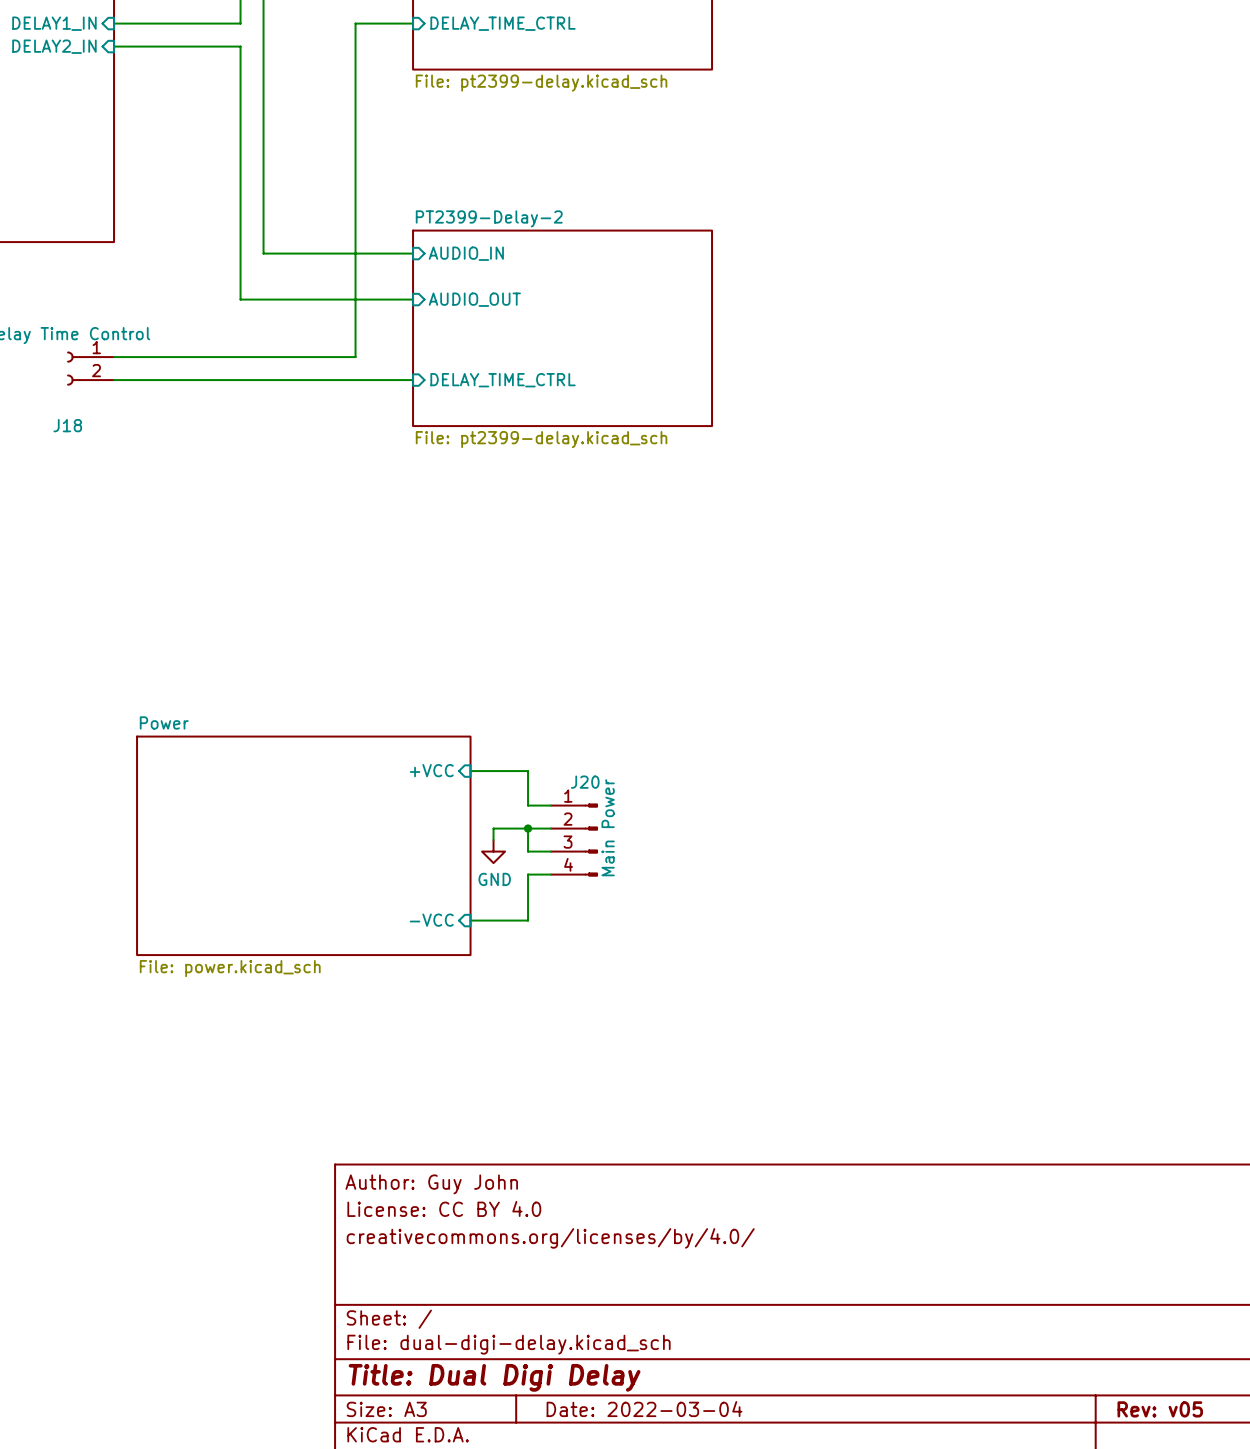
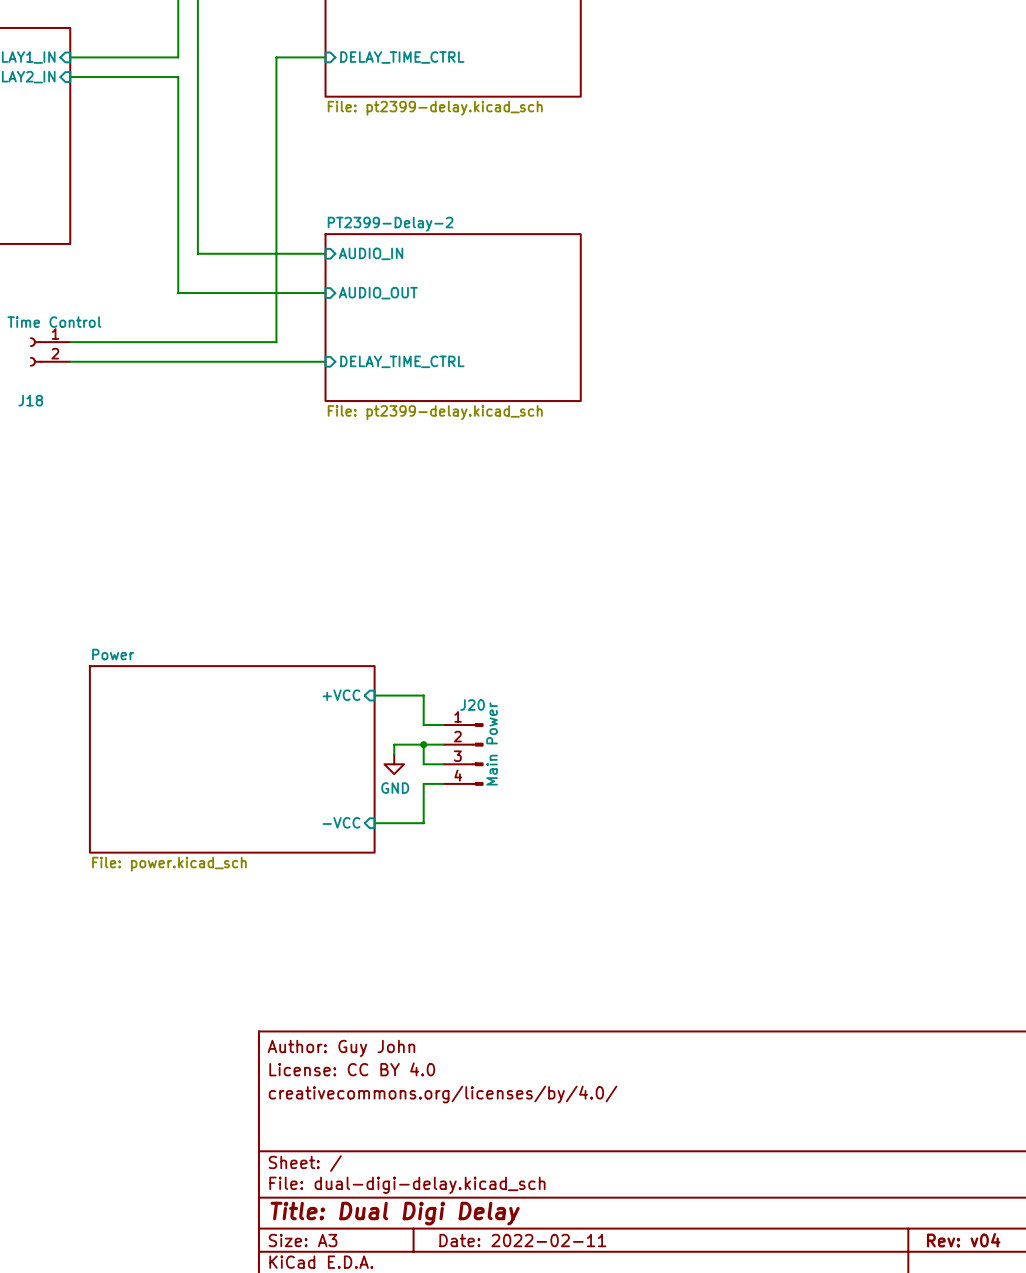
title block: Date: 2022-03-04 (644, 1409) -> Date: 2022-02-11 (522, 1240)
title block: Rev: v05 (1160, 1409) -> Rev: v04 (963, 1240)

